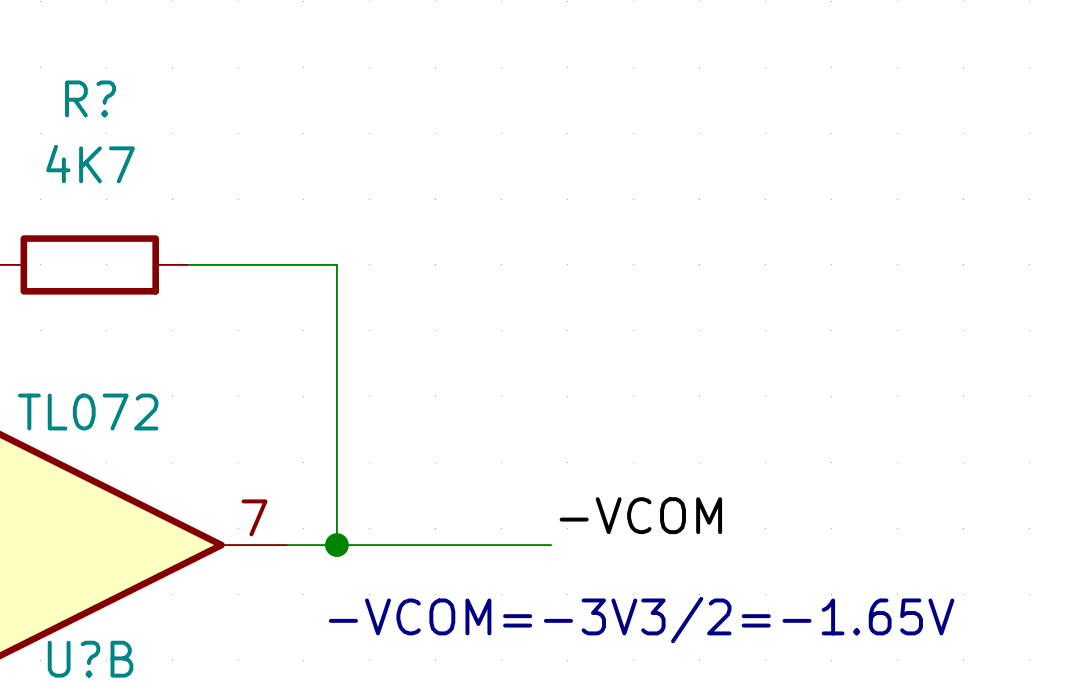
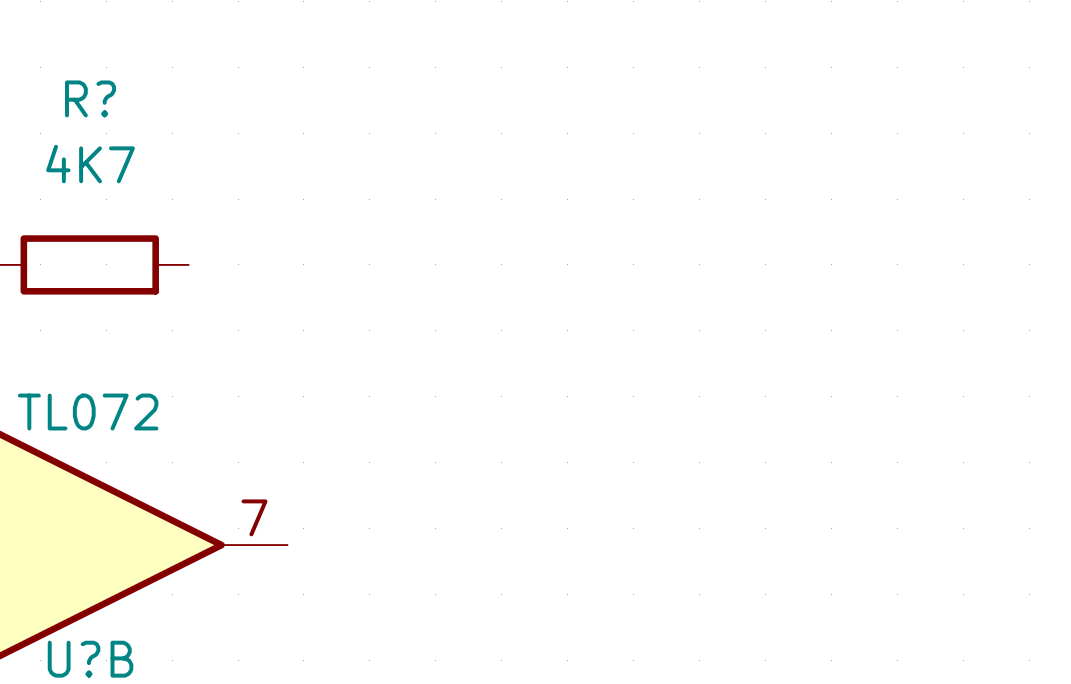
wire: (188, 264) (336, 264) (336, 545) -> none
label: -VCOM (640, 515) -> none
wire: (287, 545) (551, 545) -> none
junction: (336, 545) -> none
text: -VCOM=-3V3/2=-1.65V (641, 620) -> none

